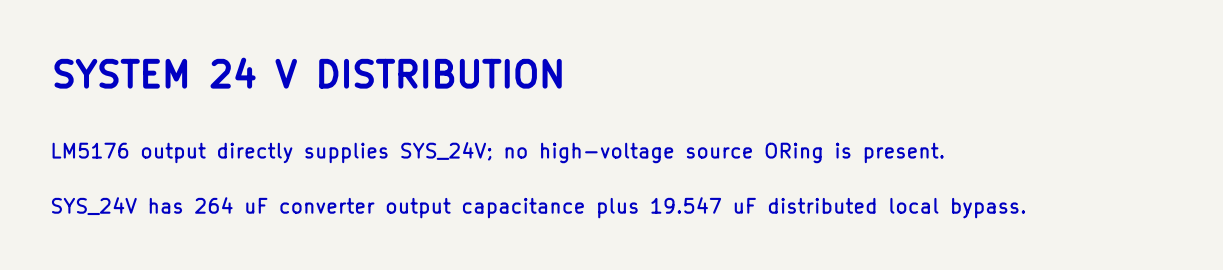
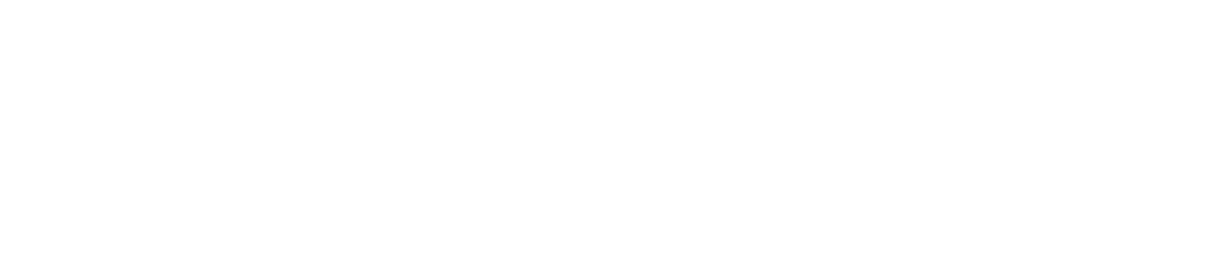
text: SYSTEM 24 V DISTRIBUTION (308, 73) -> none
text: LM5176 output directly supplies SYS_24V; no high-voltage source ORing is present. (498, 152) -> none
text: SYS_24V has 264 uF converter output capacitance plus 19.547 uF distributed local bypass. (538, 207) -> none

